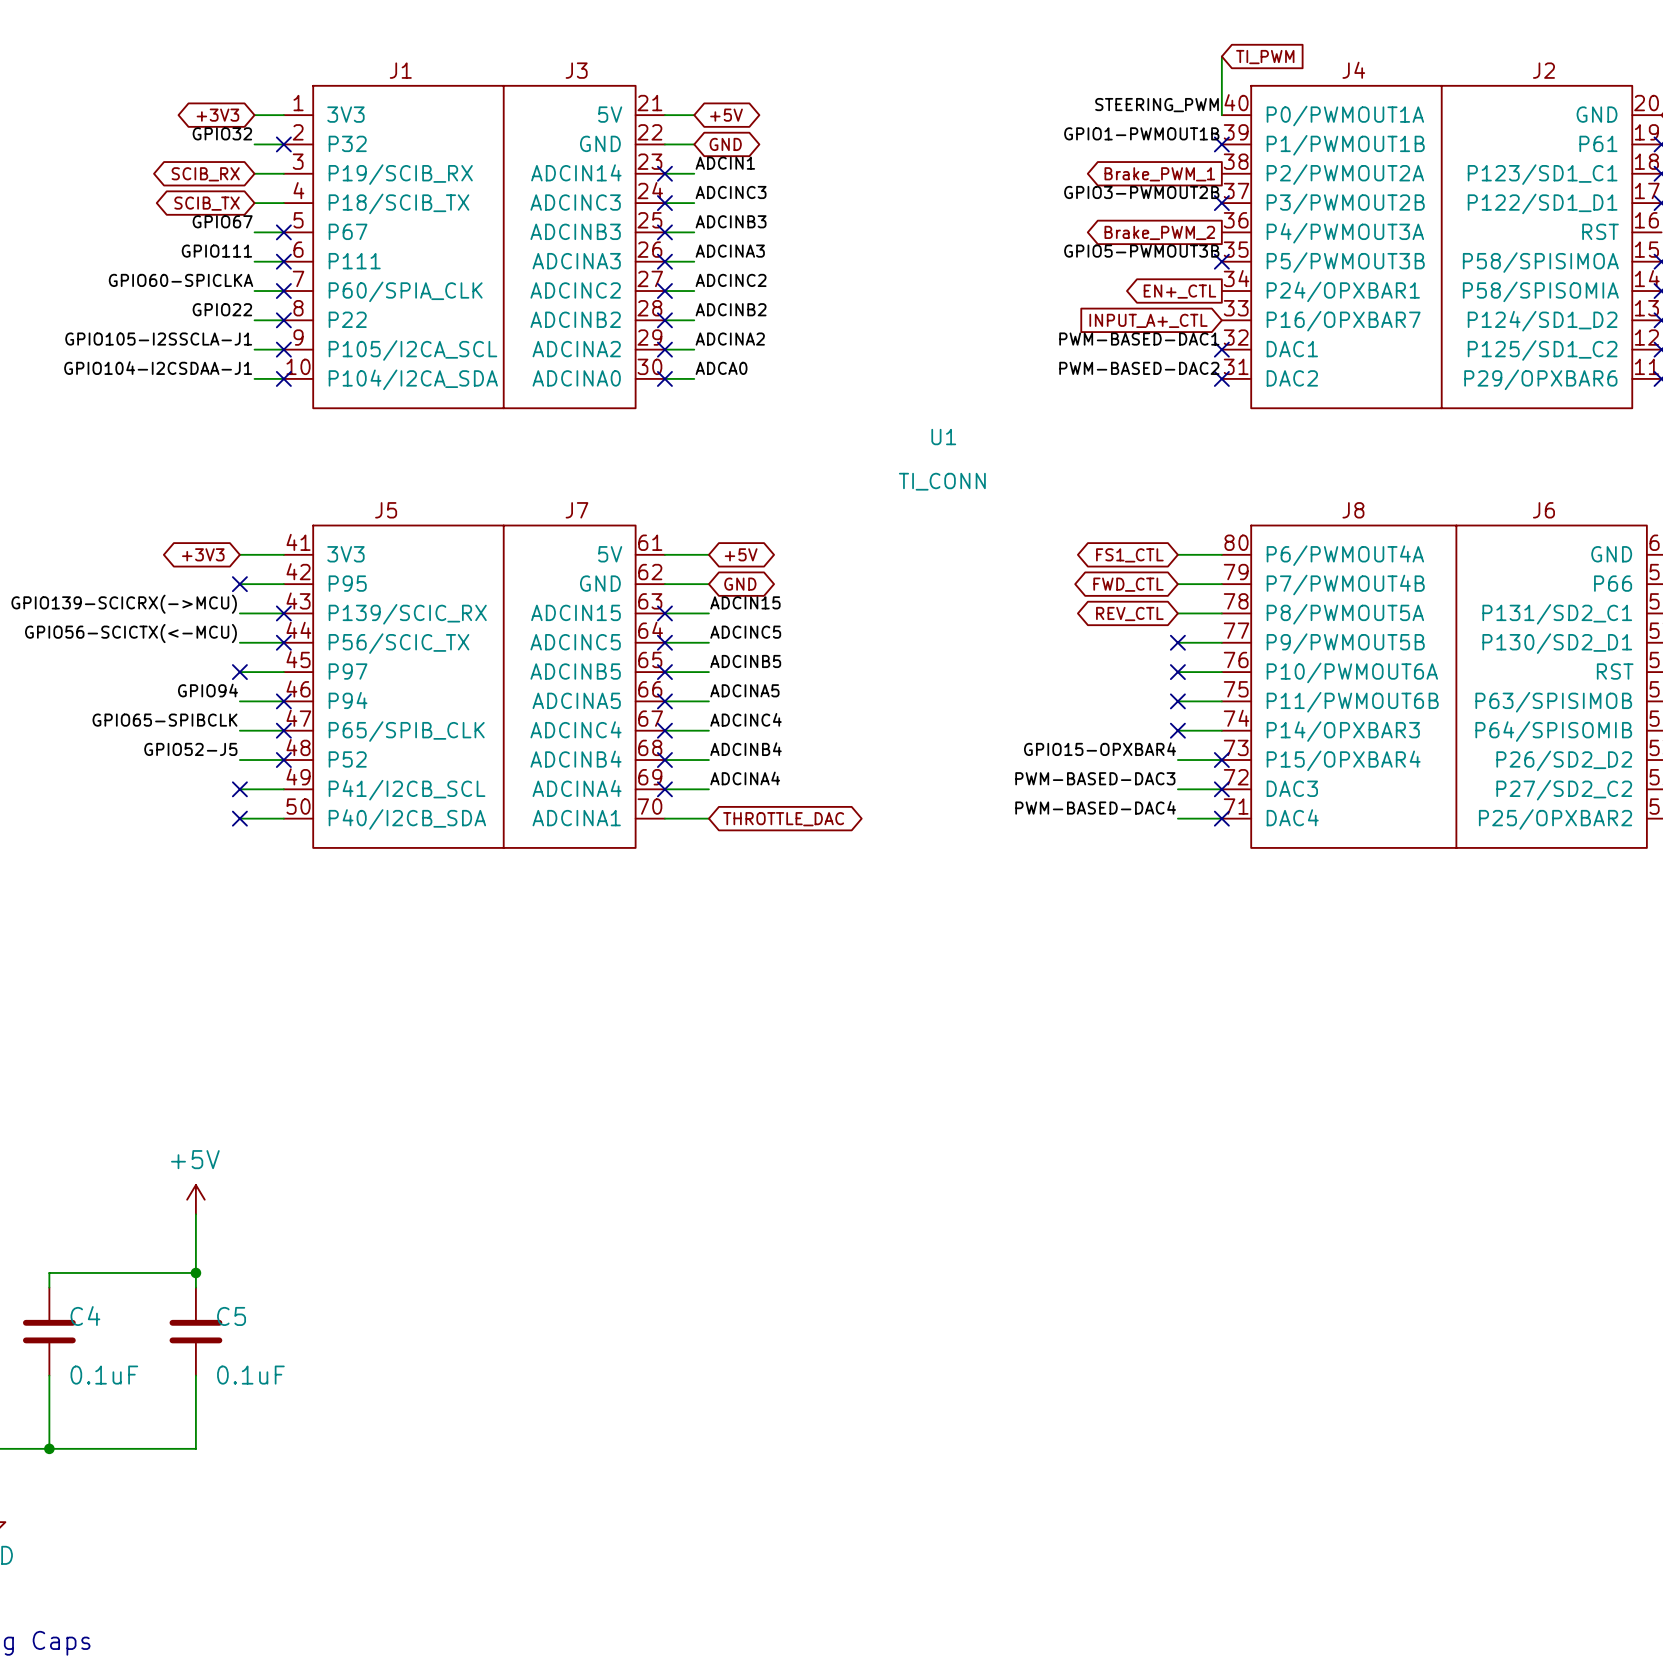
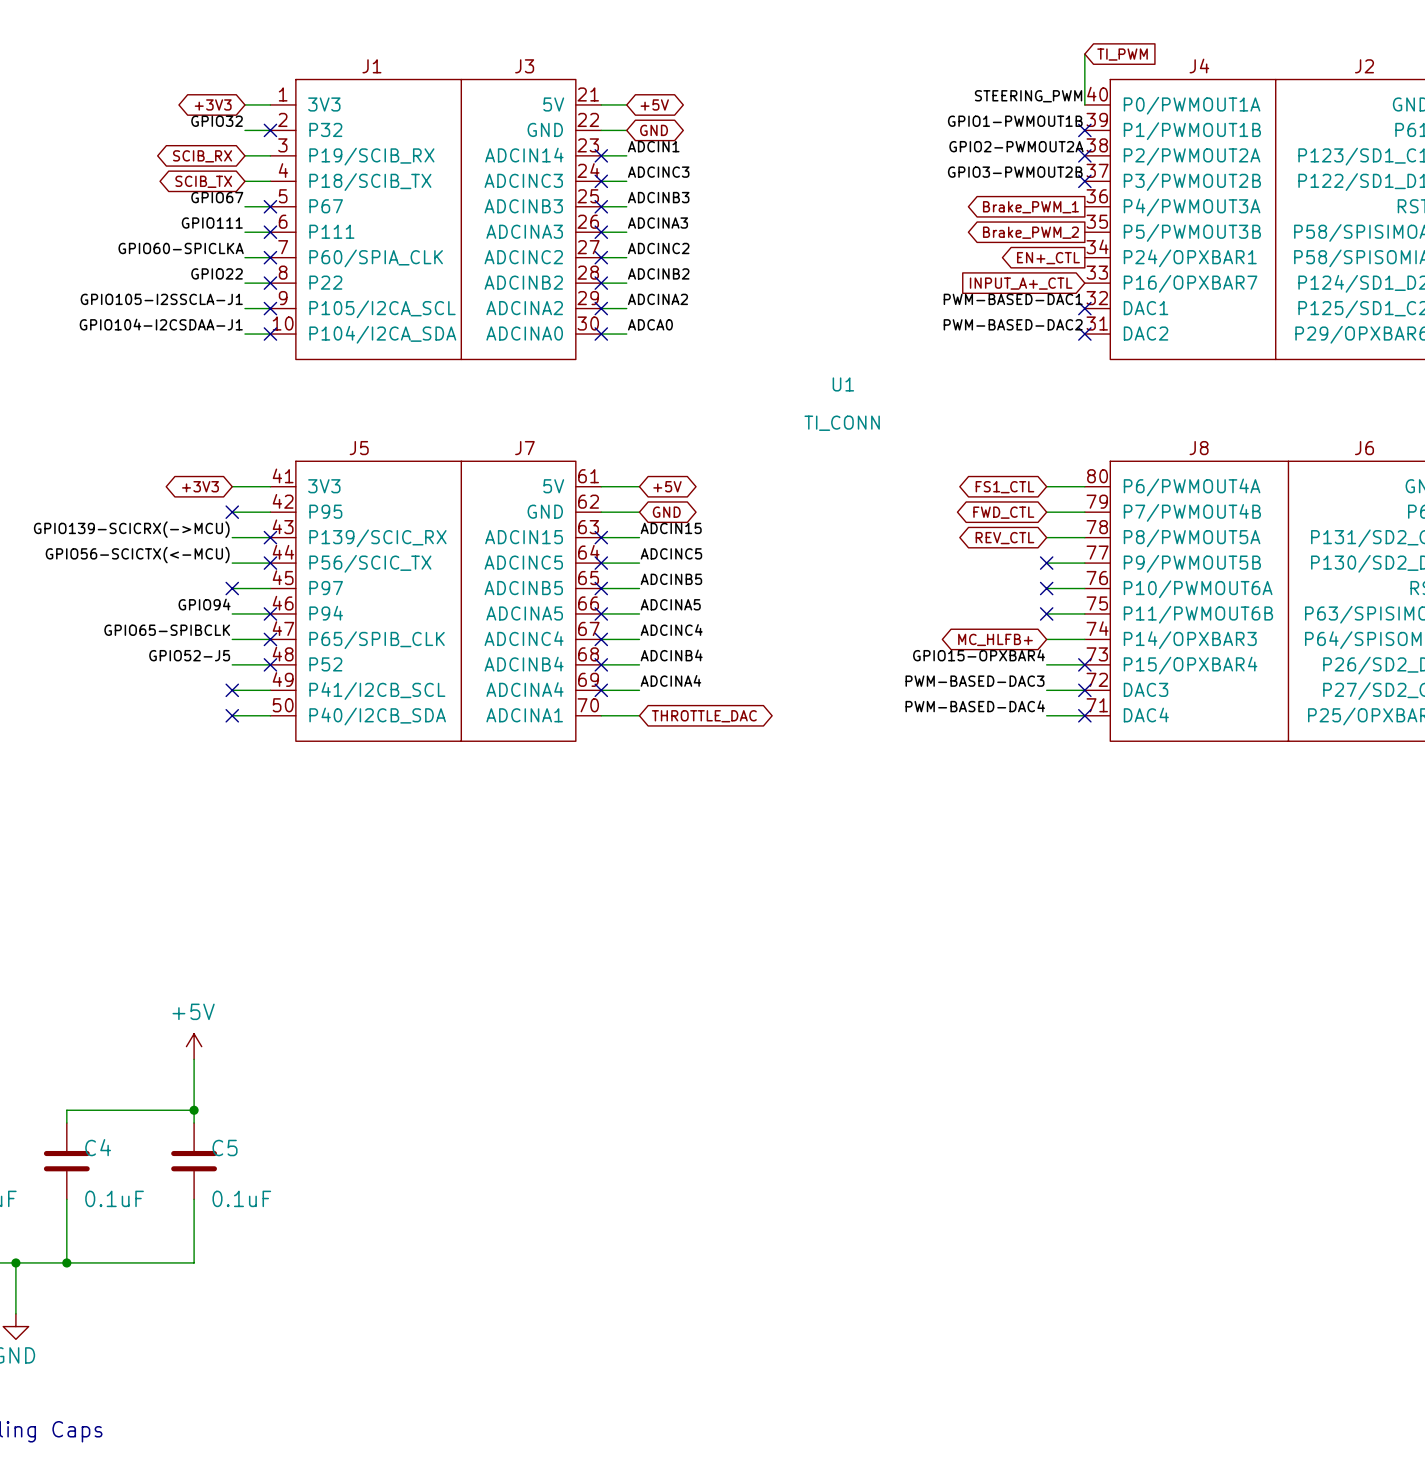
label: none -> GPIO2-PWMOUT2A (1016, 146)
no-connect mark: none -> (1084, 155)
global label: Brake_PWM_1 (1159, 174) -> none
global label: Brake_PWM_2 (1159, 232) -> Brake_PWM_1 (1030, 207)
label: GPIO5-PWMOUT3B (1141, 251) -> none
no-connect mark: (1221, 261) -> none
global label: none -> Brake_PWM_2 (1030, 232)
no-connect mark: (1177, 730) -> none
global label: none -> MC_HLFB+ (995, 639)

